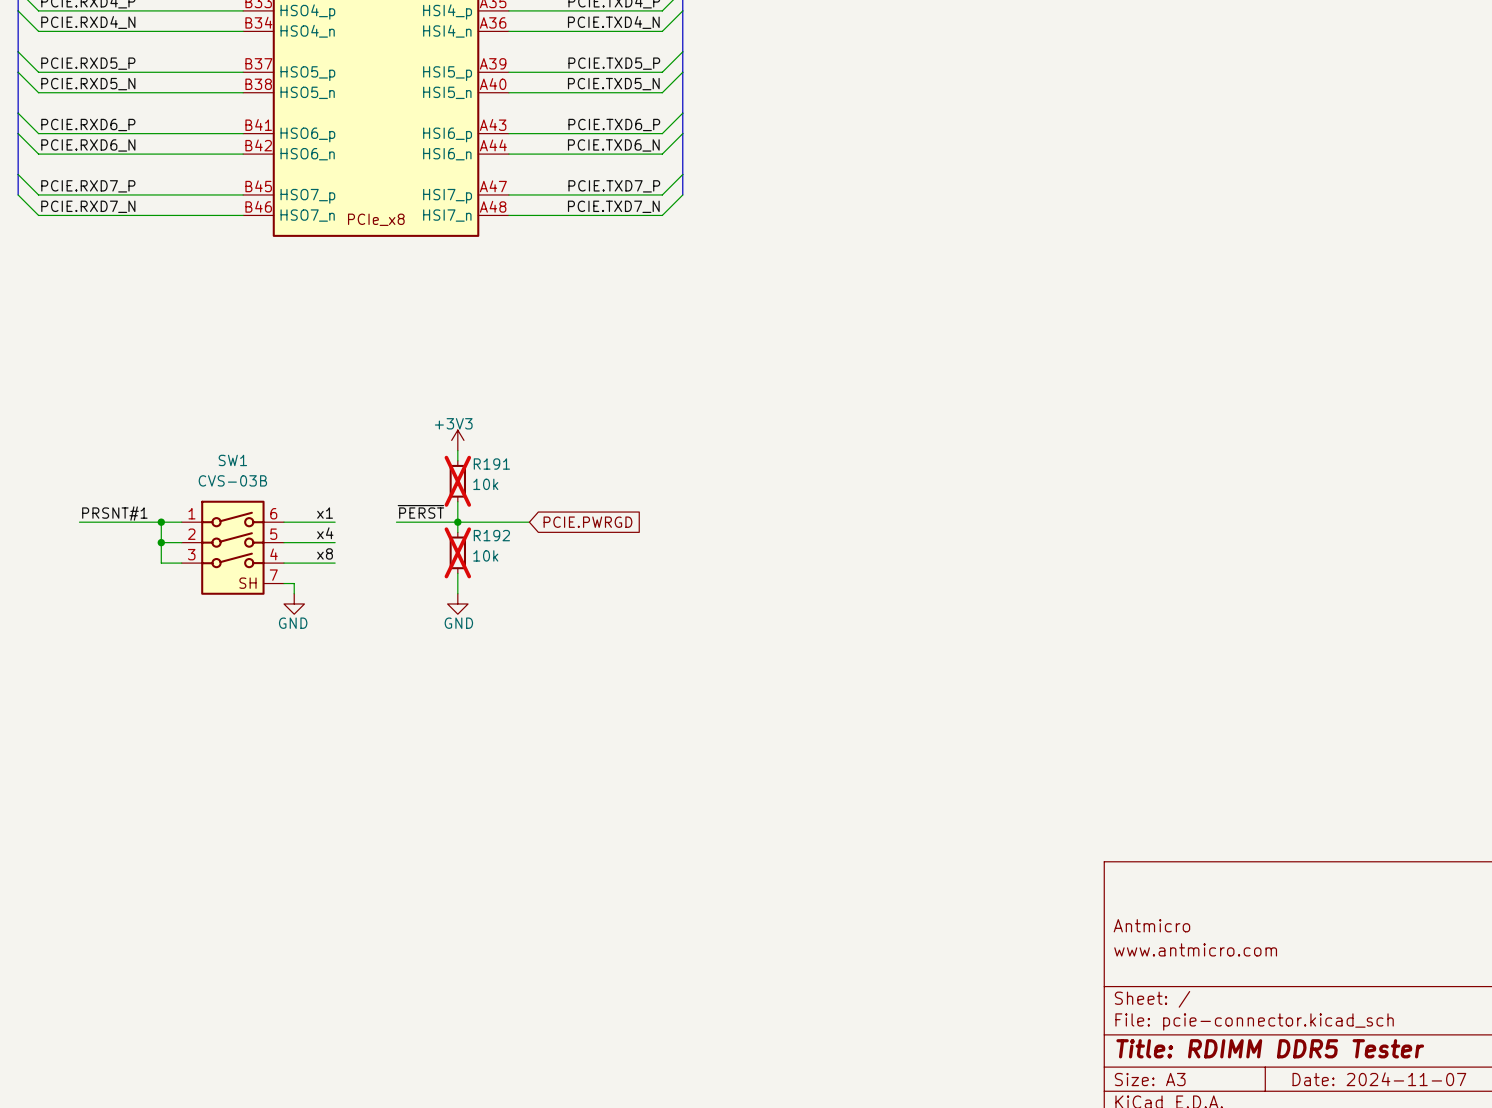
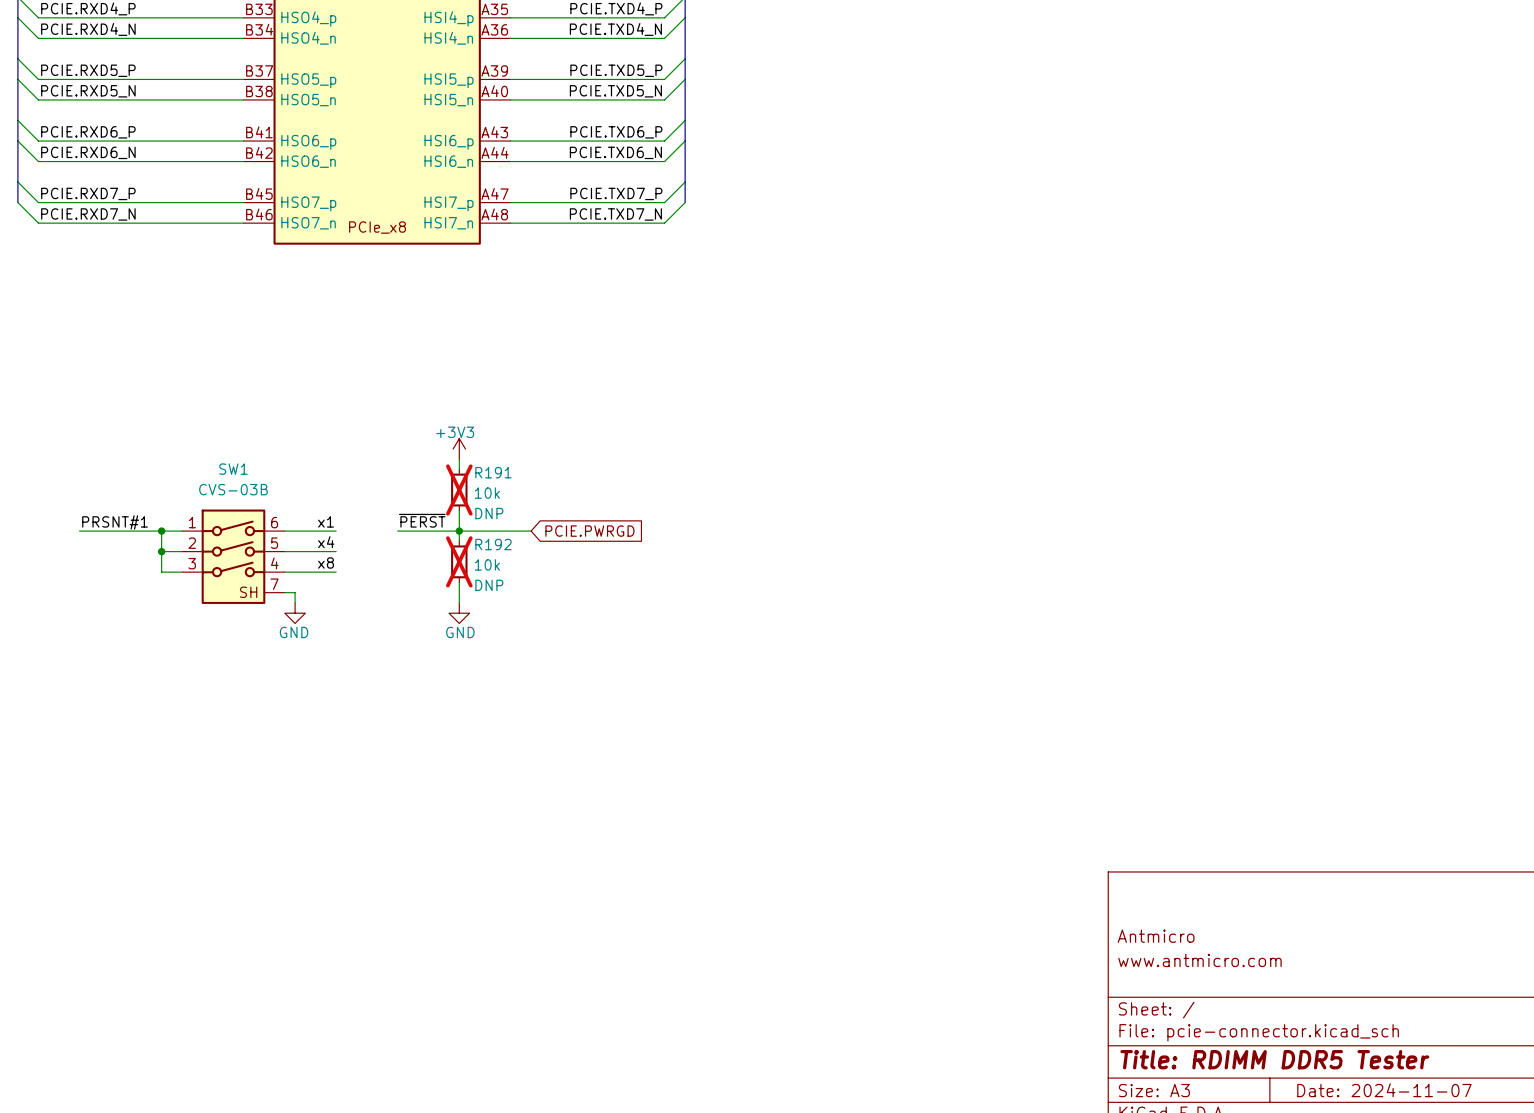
R191 text: none -> DNP (489, 513)
R192 text: none -> DNP (489, 585)

